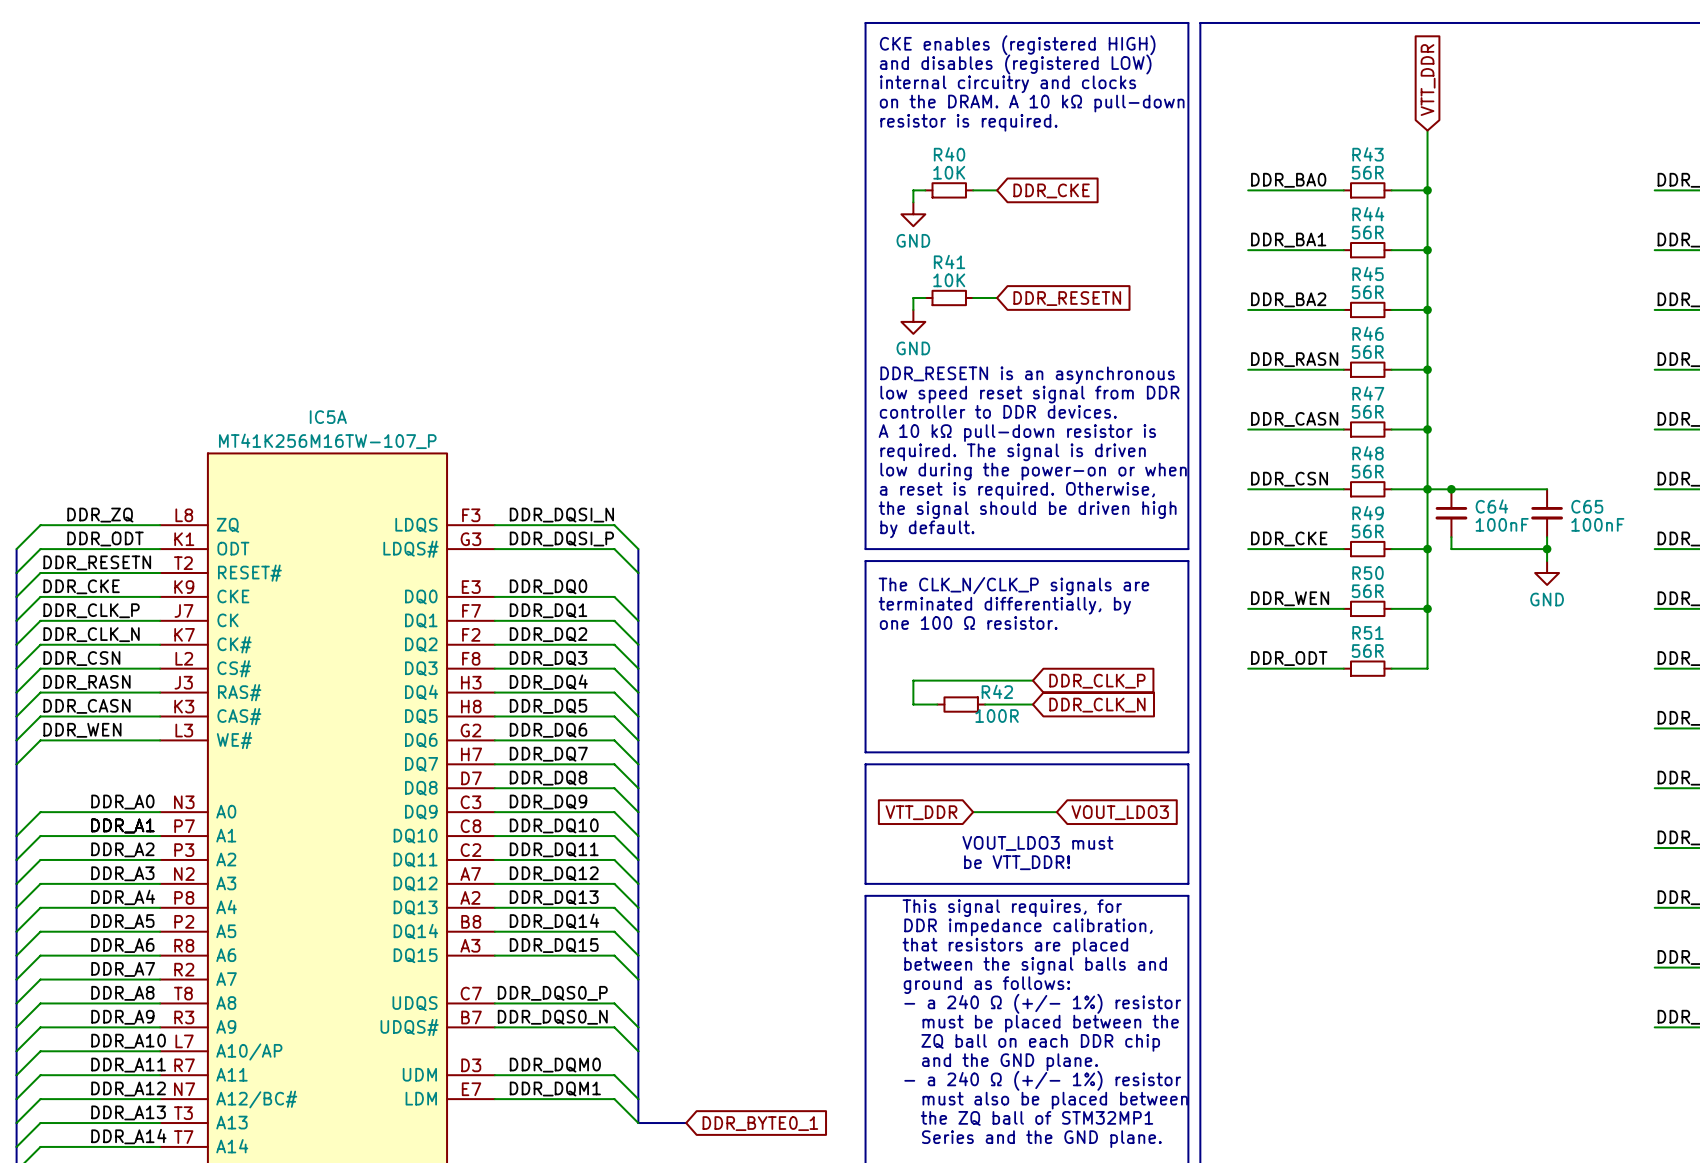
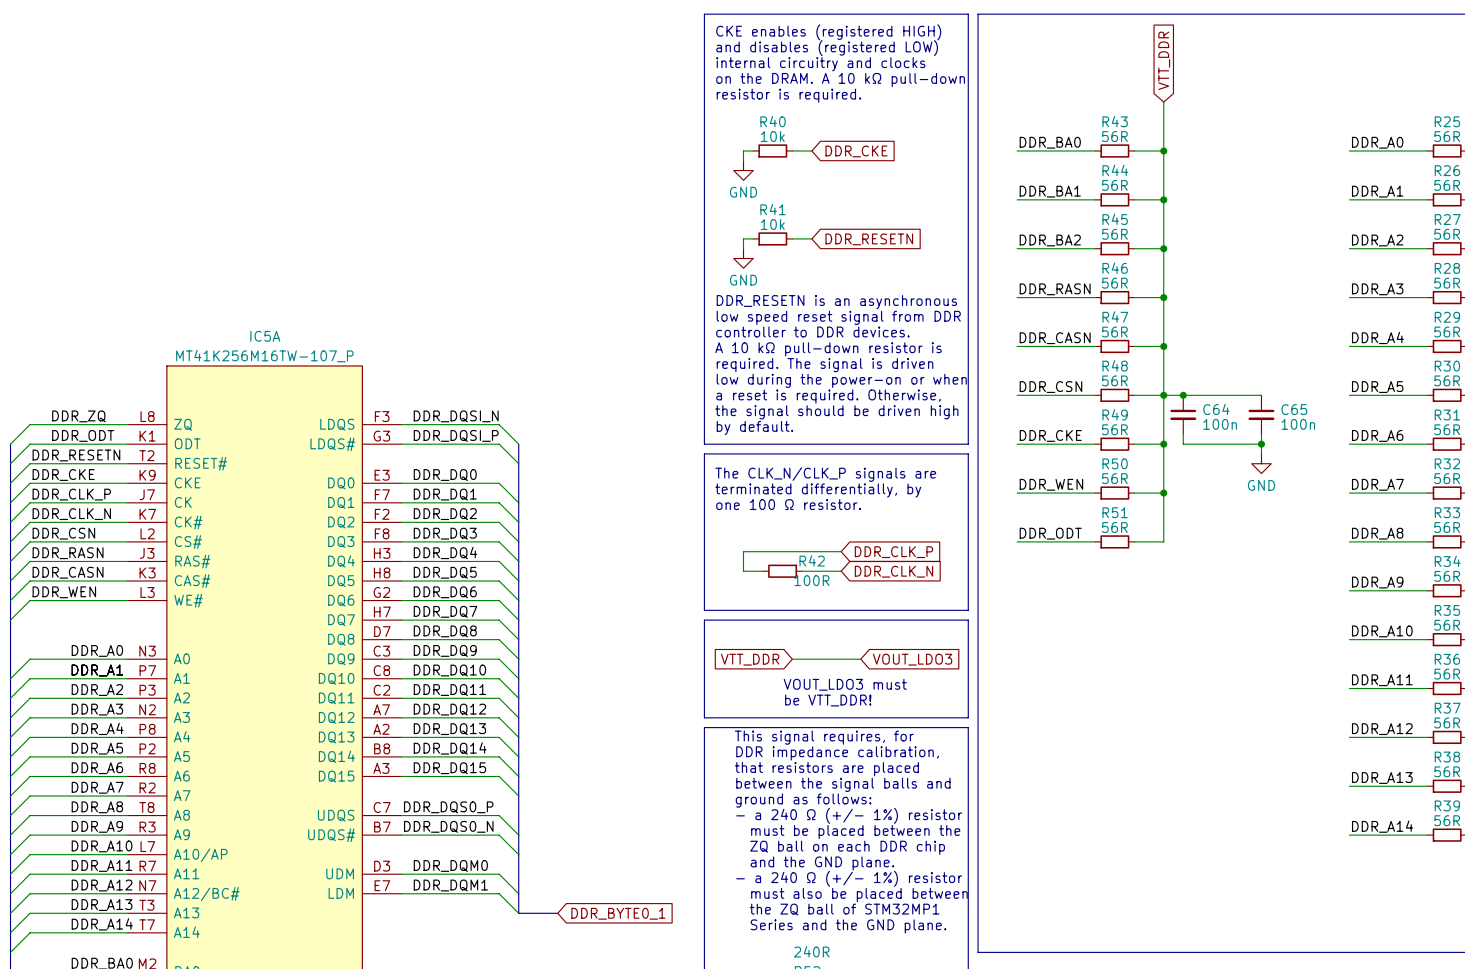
R40 value: 10K (949, 172) -> 10k (772, 136)
R41 value: 10K (949, 280) -> 10k (772, 224)
C64 value: 100nF (1502, 524) -> 100n (1220, 424)
C65 value: 100nF (1597, 524) -> 100n (1298, 424)

